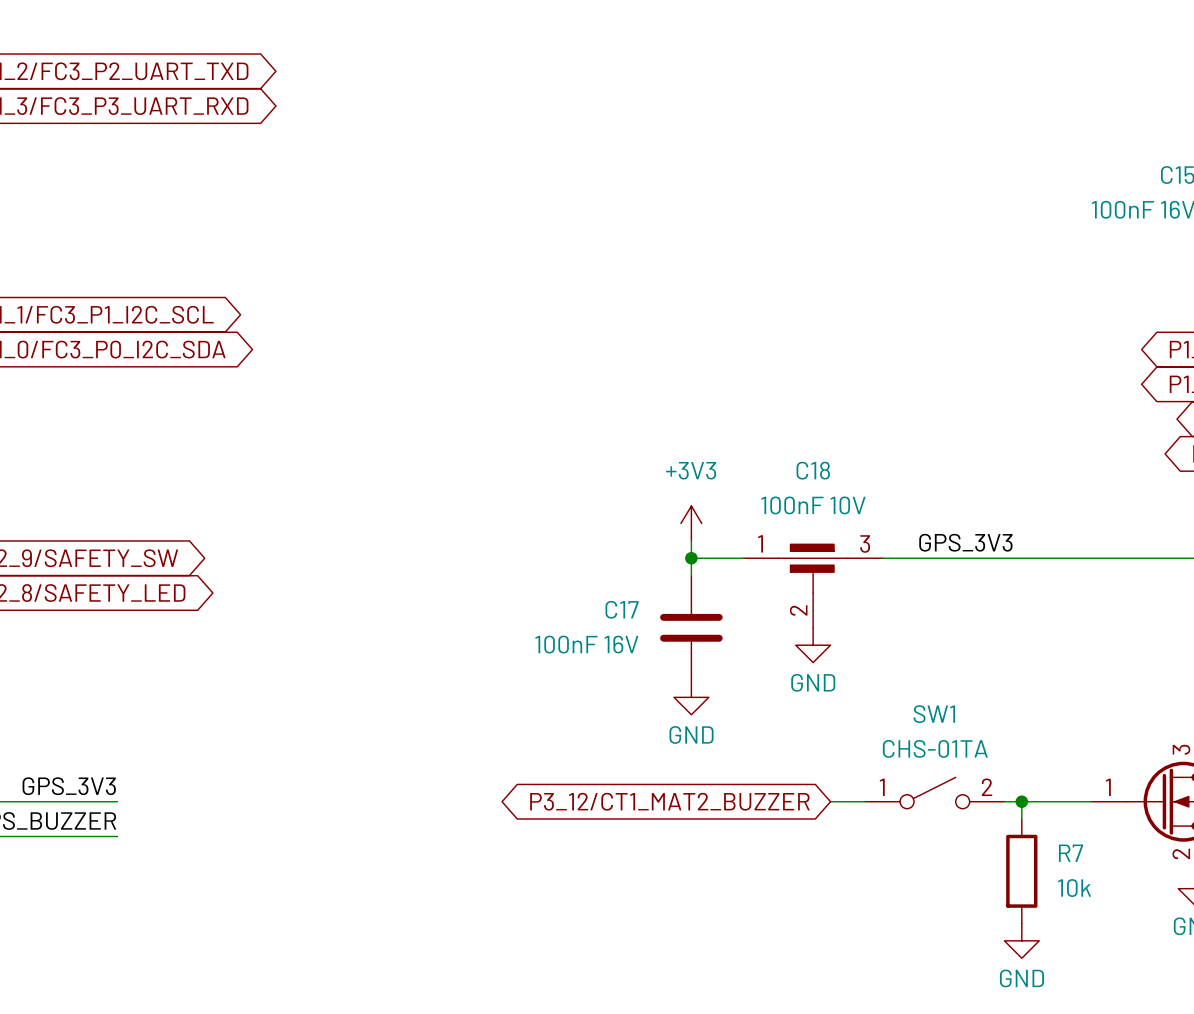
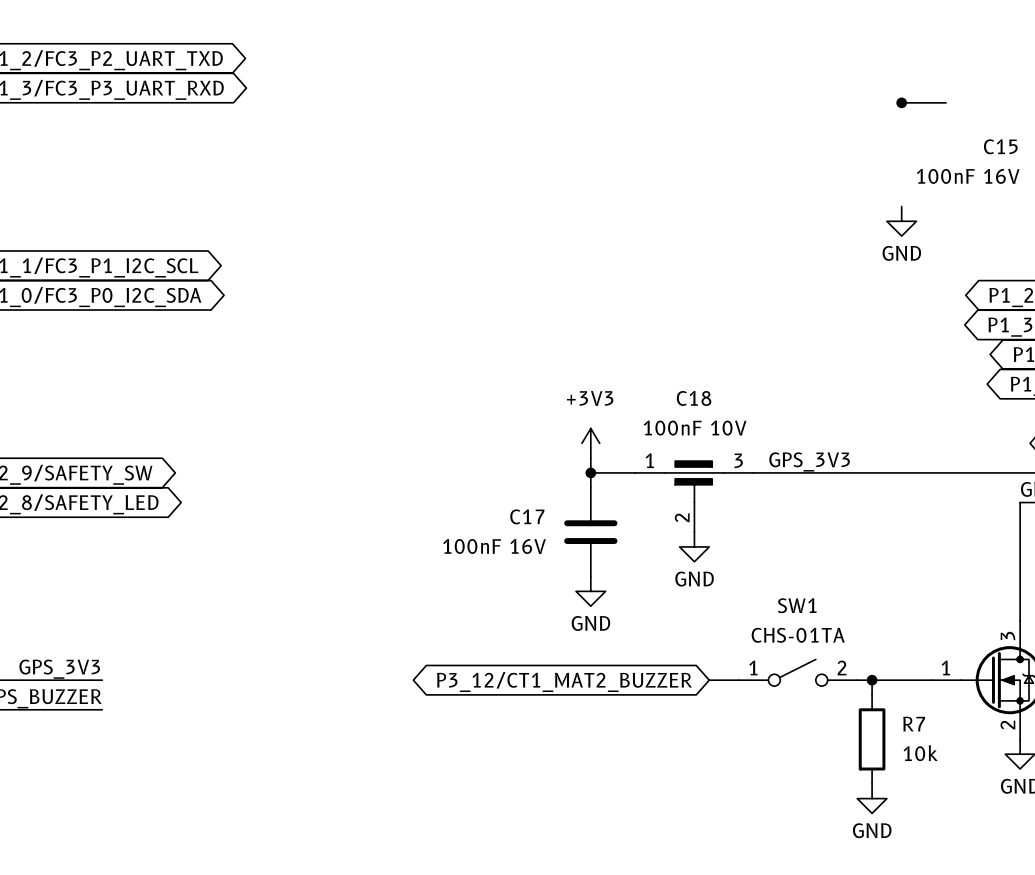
wire: none -> (901, 102) (946, 102)
junction: none -> (901, 102)
power symbol: none -> GND (901, 221)
label position: GPS_3V3 (965, 542) -> GPS_3V3 (809, 461)

